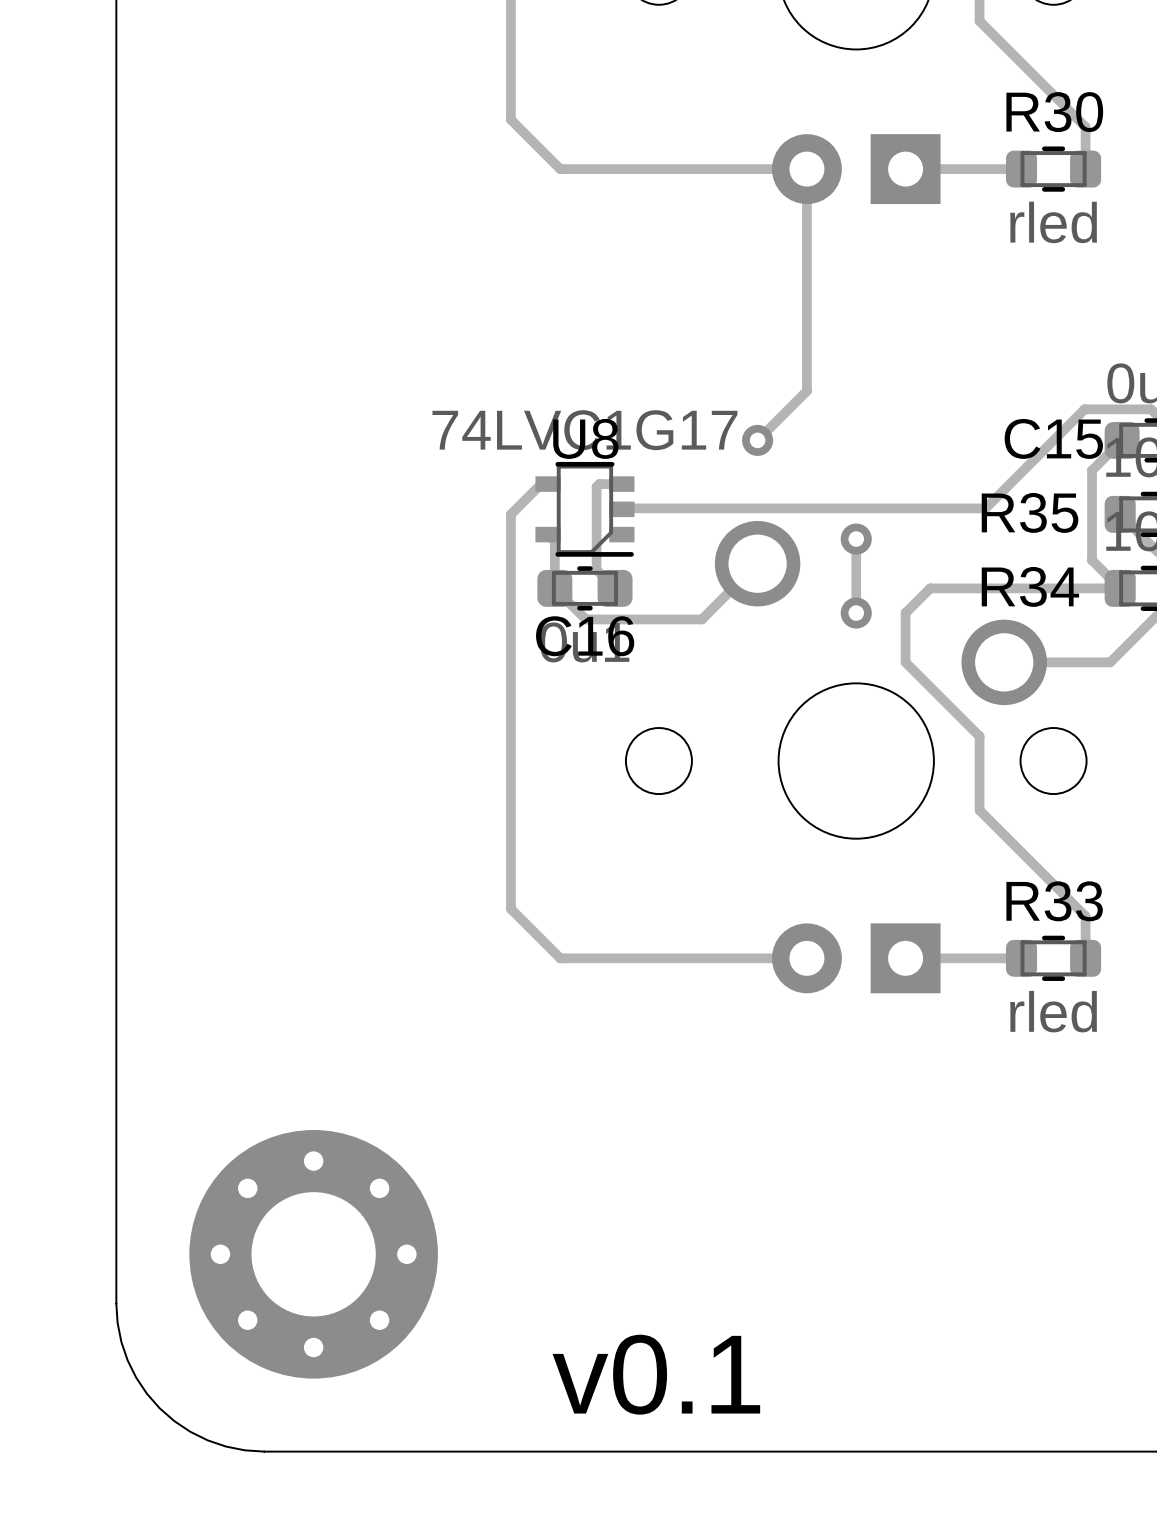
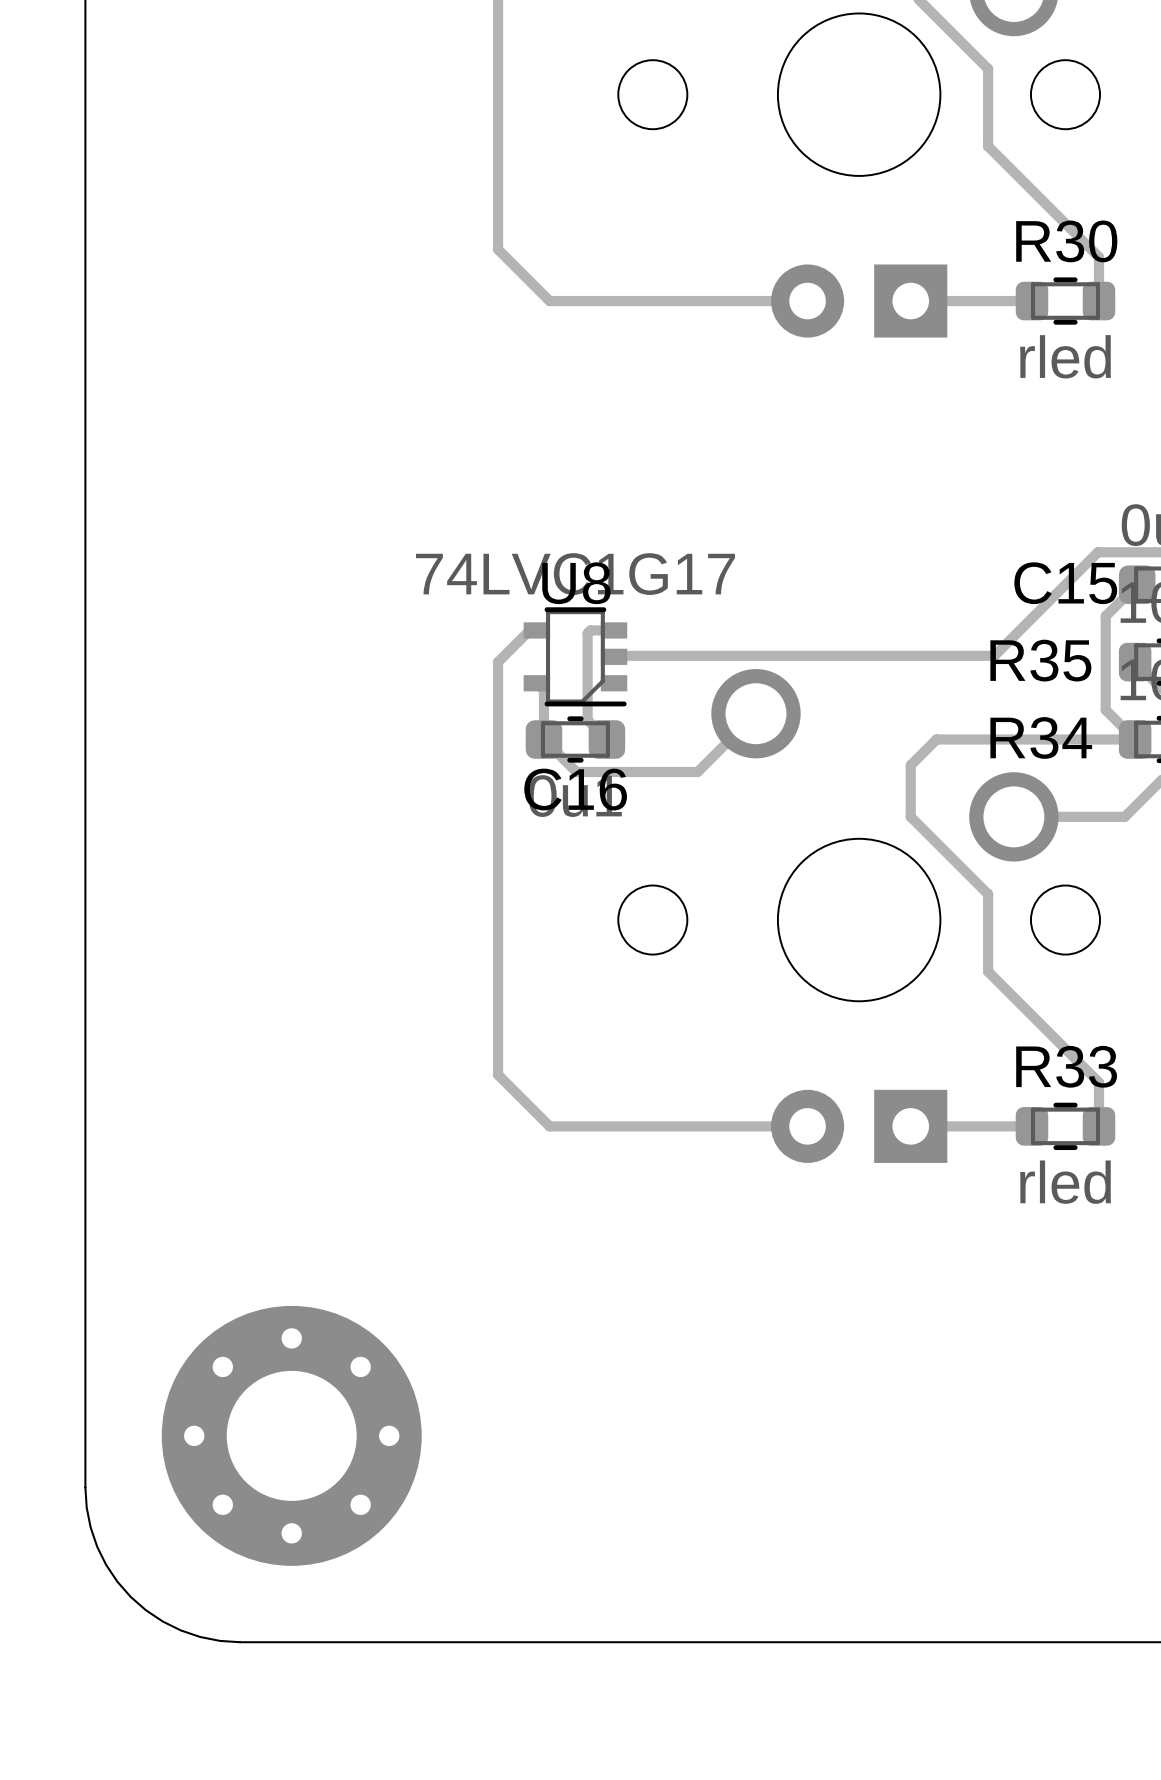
track: (806, 169) (806, 391) (757, 440) -> none
via: (757, 440) -> none
track: (856, 539) (856, 613) -> none
via: (856, 539) -> none
via: (856, 613) -> none
text: v0.1 (656, 1374) -> none

